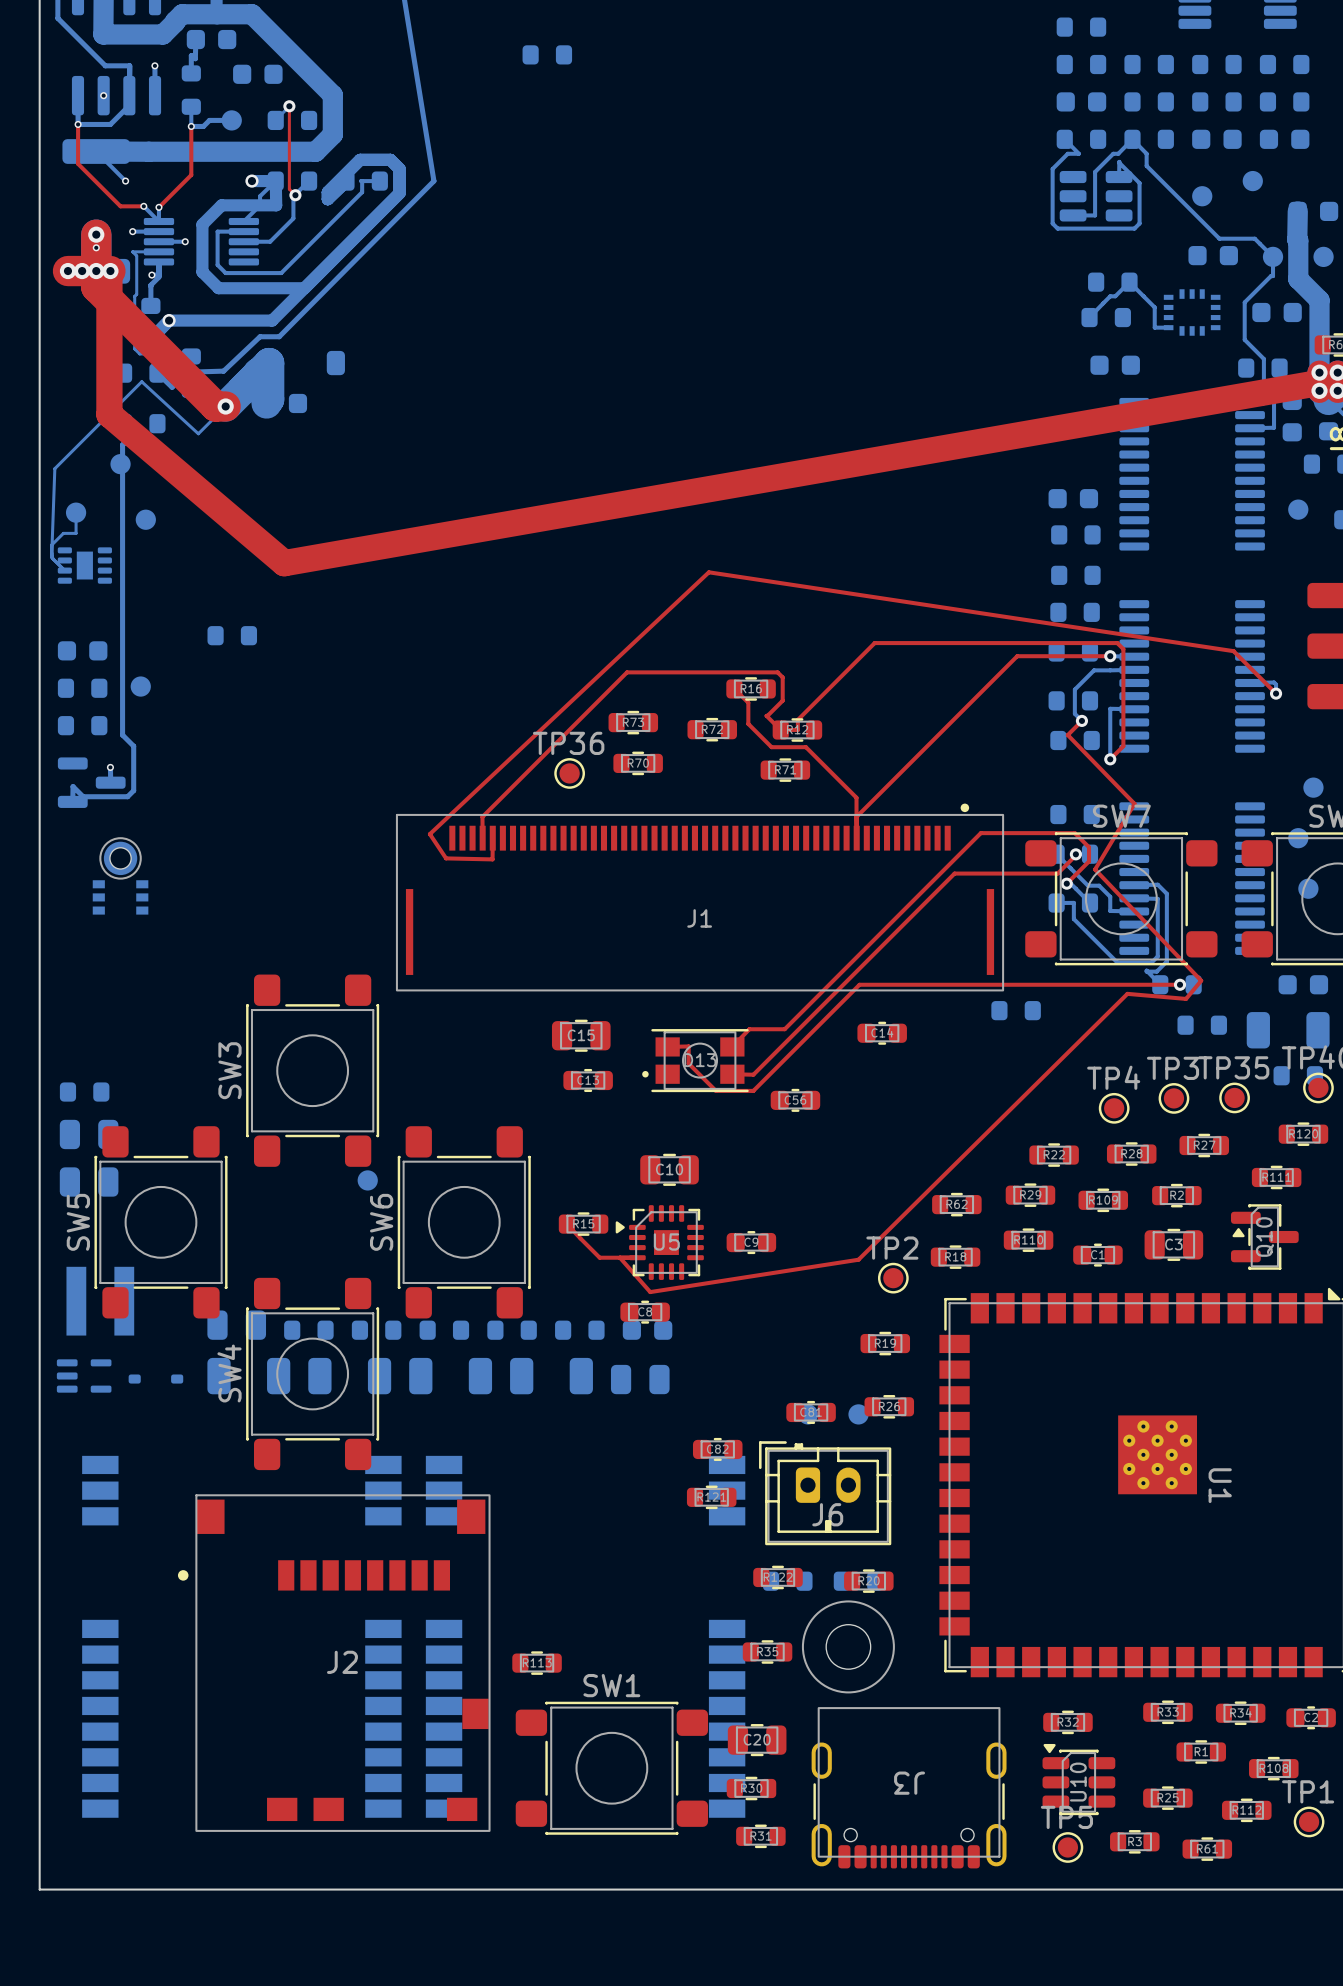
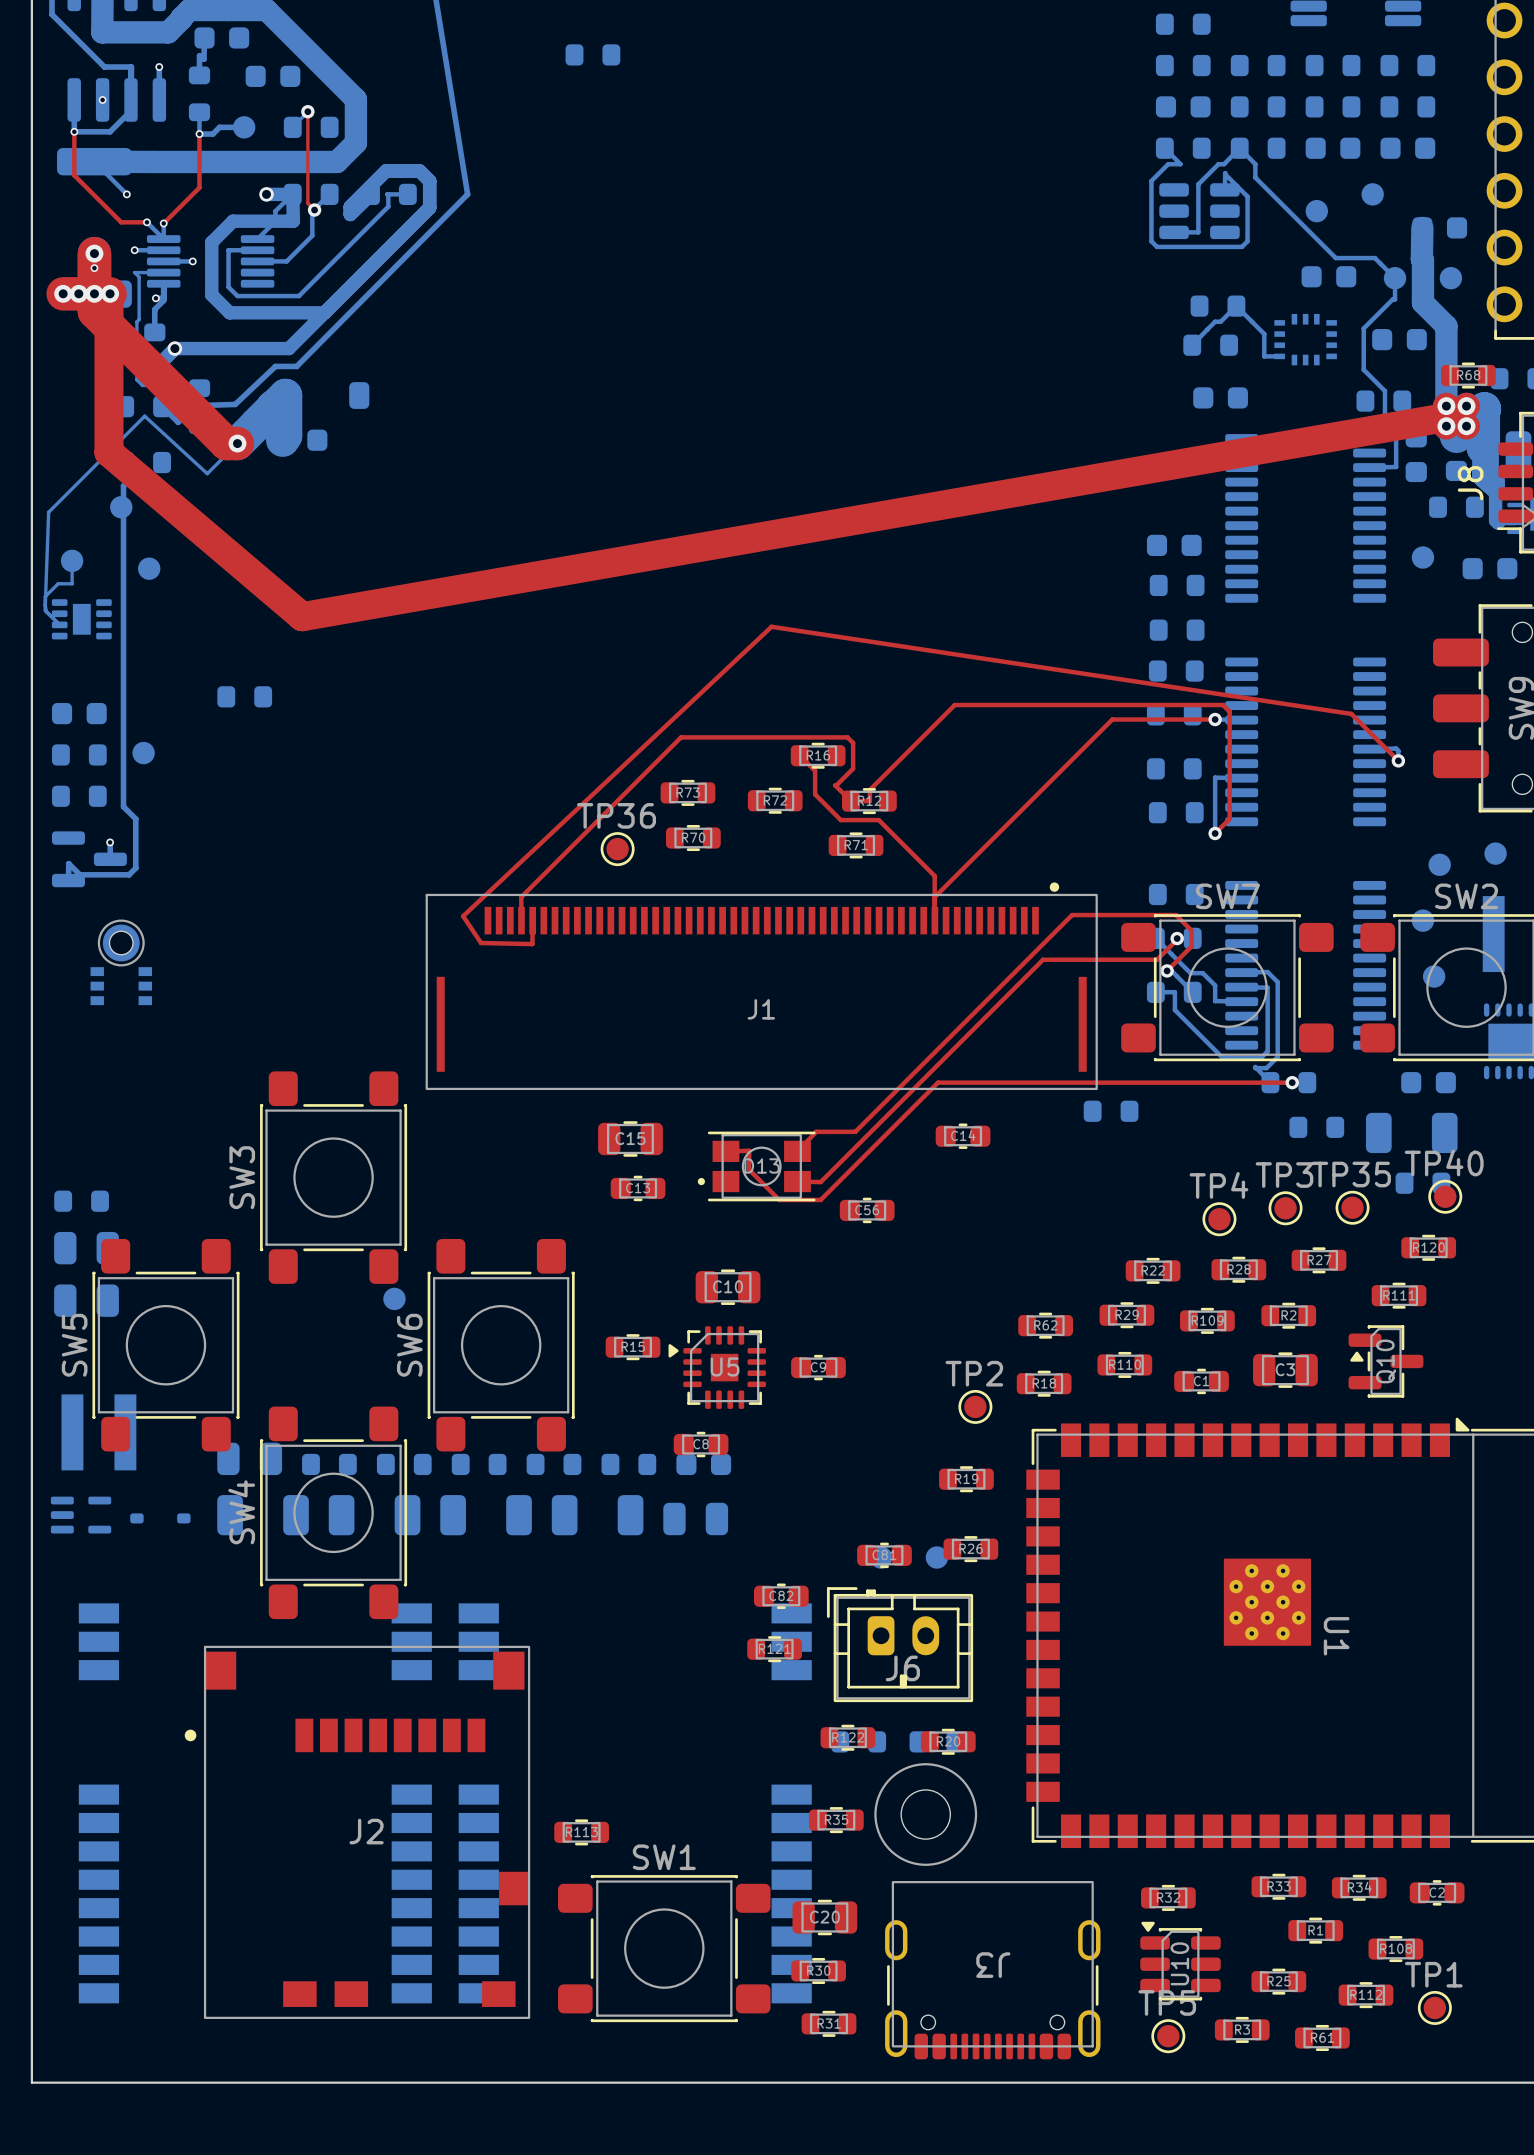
bottom track: (1134, 669) (1094, 670) (1074, 689) (1074, 713) (1081, 720) -> none
top track: (1081, 720) (1067, 735) (1134, 803) (1095, 869) (1201, 980) (1186, 998) (1127, 993) (858, 1259) (650, 1292) (619, 1257) -> none
via: (1081, 720) -> none
top track: (566, 1224) (599, 1257) (637, 1257) -> none

